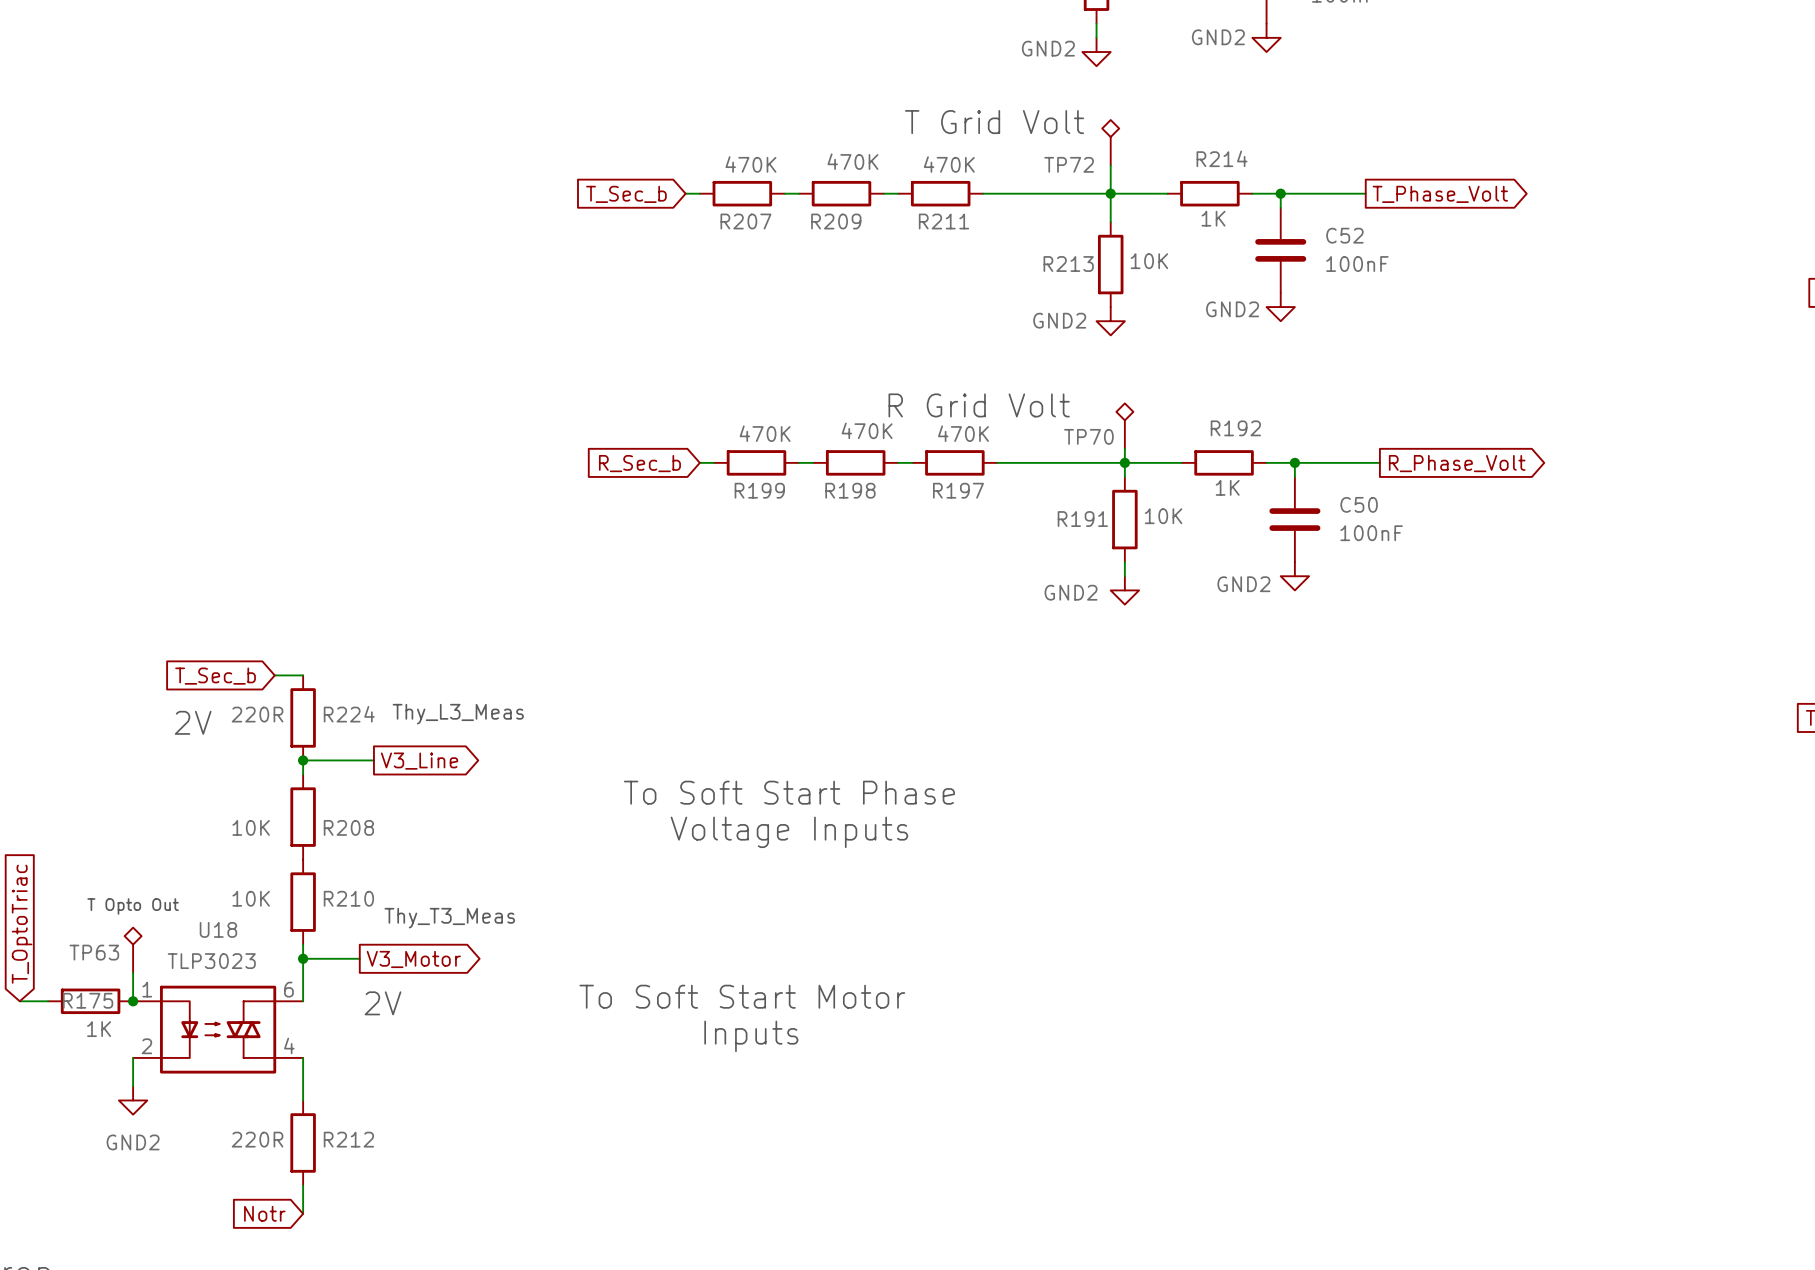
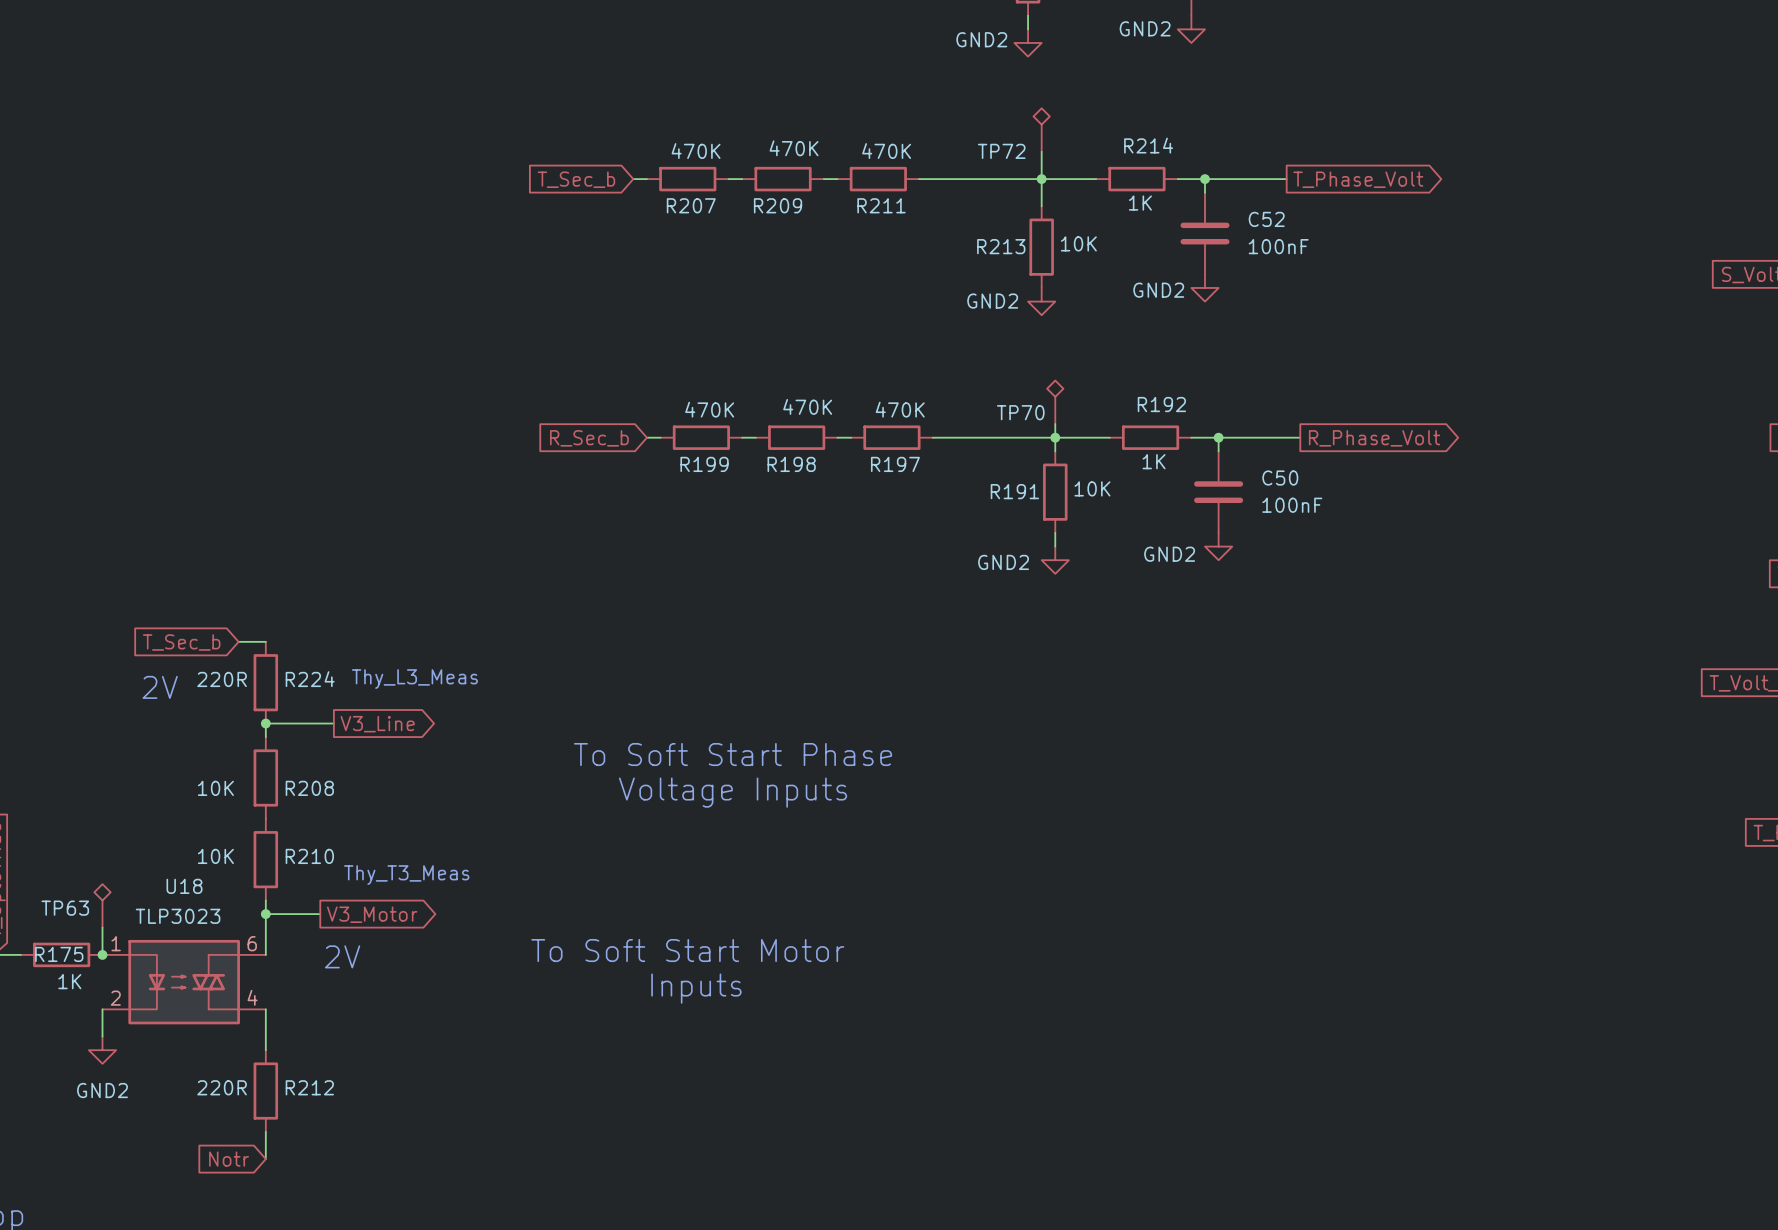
text: T Grid Volt (994, 122) -> none
text: R Grid Volt (979, 405) -> none
text: T Opto Out (133, 906) -> none

